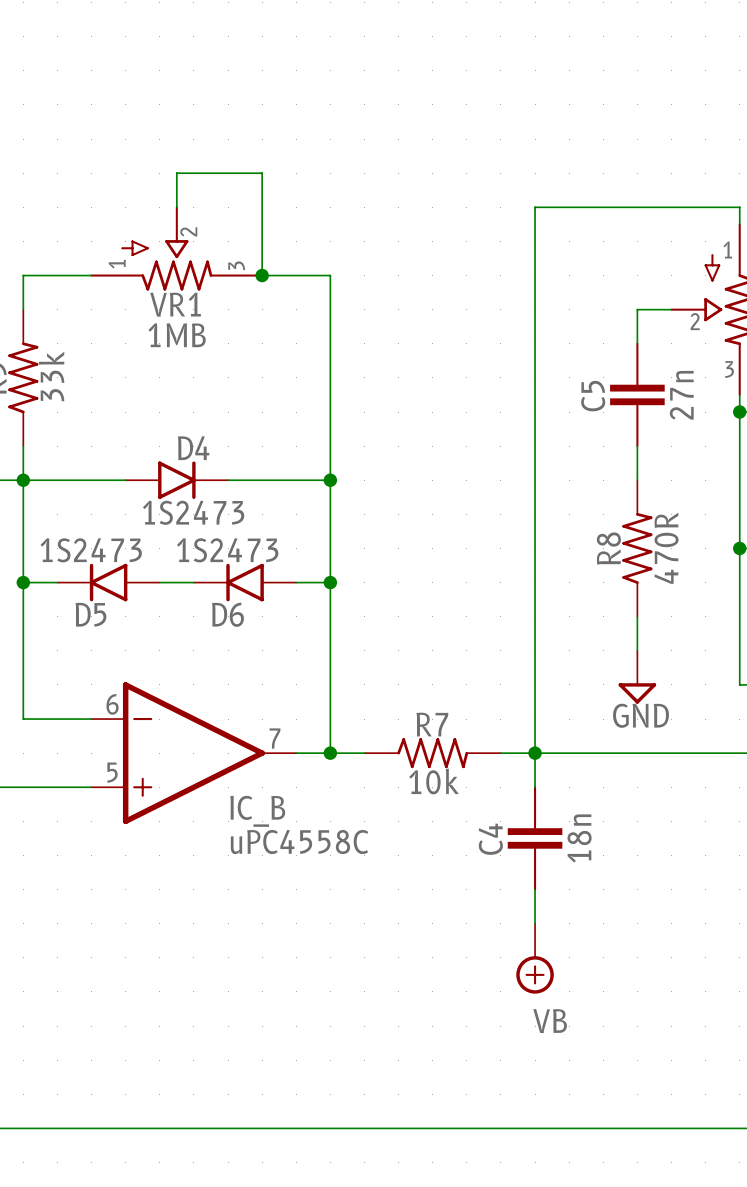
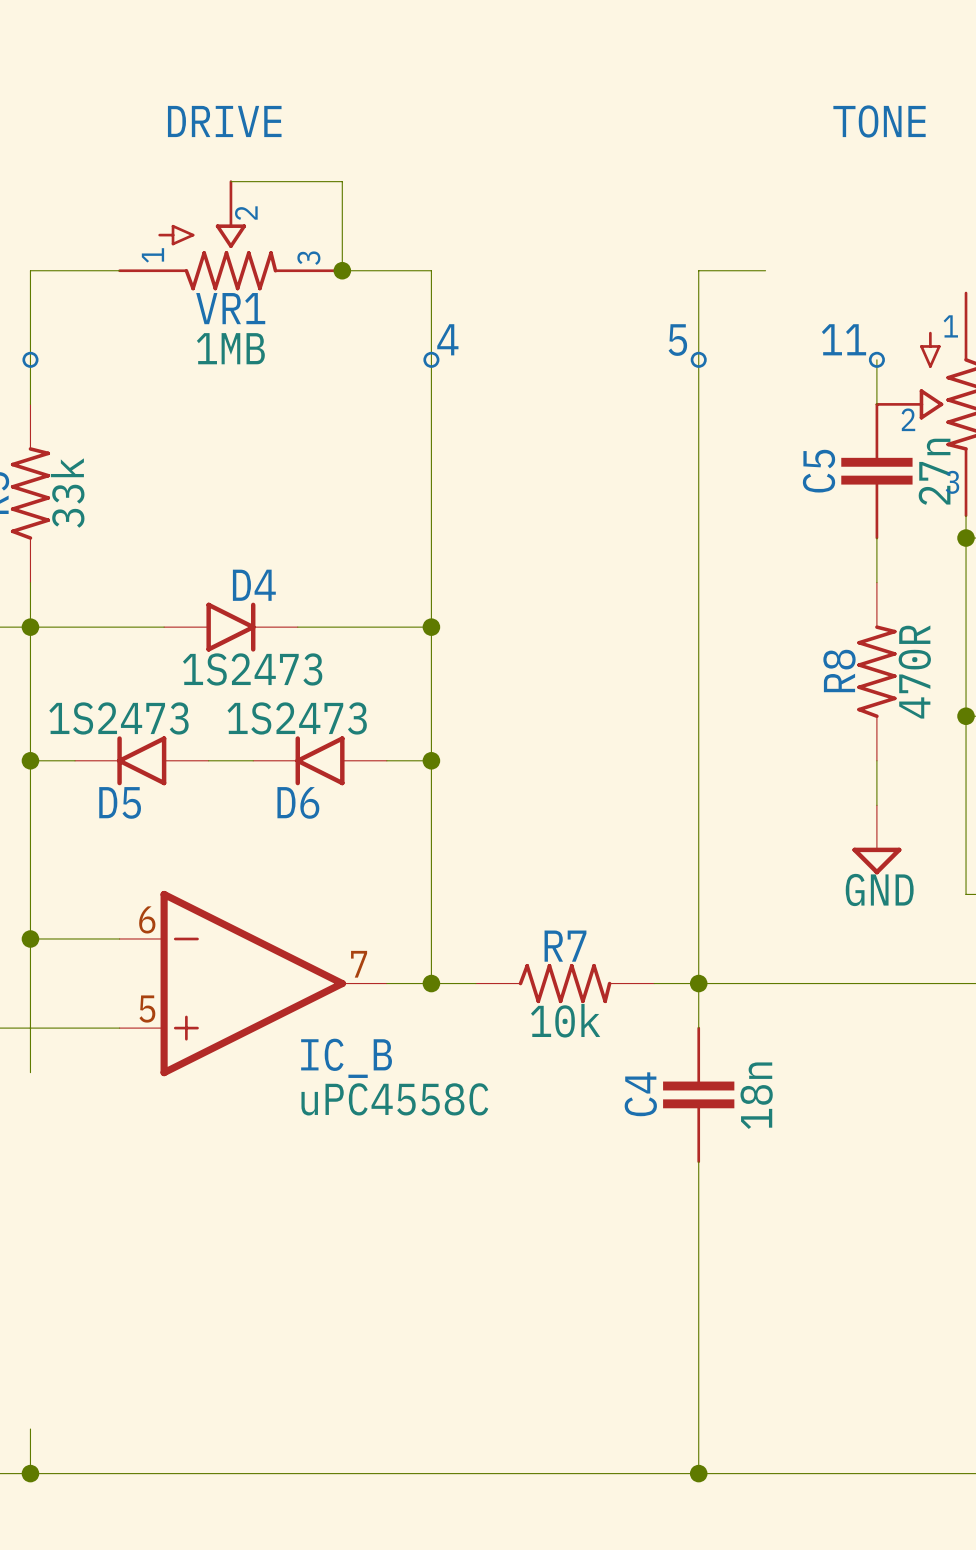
text: none -> DRIVE (224, 121)
text: none -> TONE (879, 121)
wire: (262, 173) (176, 173) (176, 207) -> (342, 226) (342, 181) (230, 181)
wire: (262, 207) (262, 275) (330, 275) -> (342, 270) (431, 270) (431, 359)
wire: (586, 207) (739, 207) (739, 224) -> none
VR1 position: (176, 248) -> (230, 235)
text: none -> 4 (447, 339)
text: none -> 5 (677, 340)
text: none -> 11 (844, 339)
drawing: none -> [22, 351, 39, 368]
drawing: none -> [423, 351, 440, 368]
drawing: none -> [690, 351, 707, 368]
drawing: none -> [868, 351, 885, 368]
wire: (23, 275) (91, 275) -> (30, 359) (30, 270) (119, 270)
junction position: (262, 275) -> (342, 270)
wire: (671, 309) (637, 309) (637, 343) -> (876, 404) (876, 359)
C5 position: (637, 394) -> (876, 471)
wire: (637, 446) (637, 480) -> (876, 538) (876, 582)
R8 position: (637, 548) -> (876, 671)
wire: (637, 616) (637, 650) -> (876, 760) (876, 805)
power symbol position: GND (637, 677) -> GND (876, 839)
wire: none -> (30, 938) (30, 1072)
junction: none -> (30, 938)
wire: none -> (698, 1206) (698, 1473)
power symbol: VB (535, 958) -> none
wire: none -> (30, 1429) (30, 1473)
junction: none -> (30, 1473)
junction: none -> (698, 1473)

